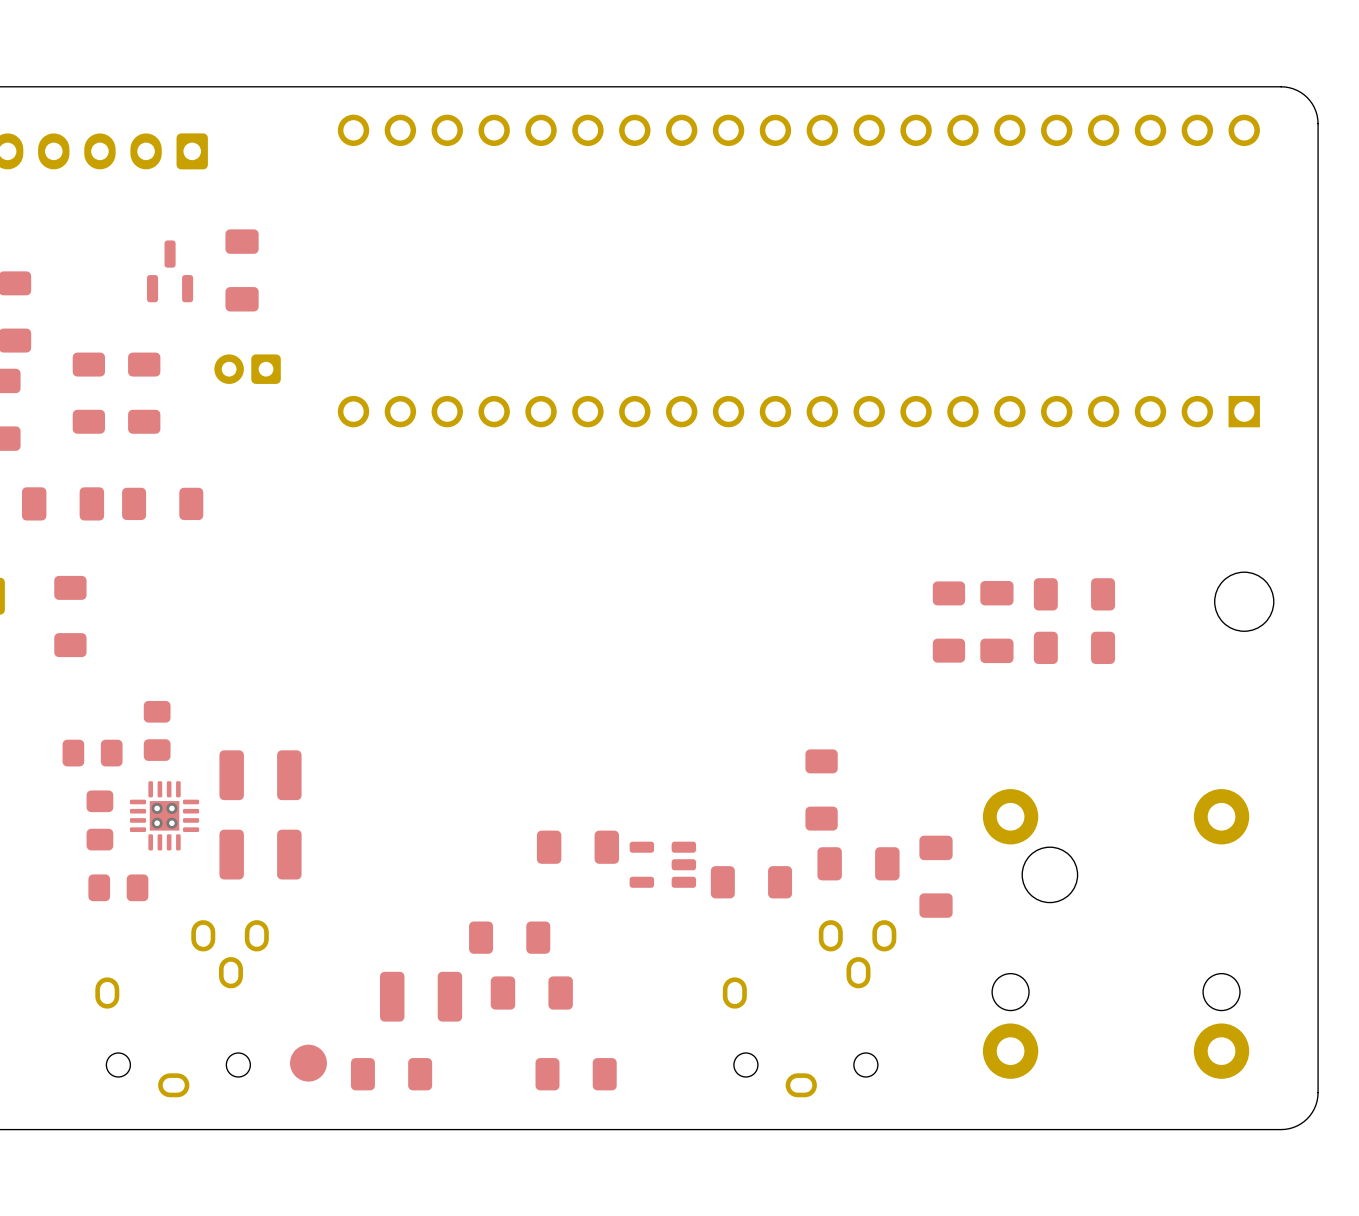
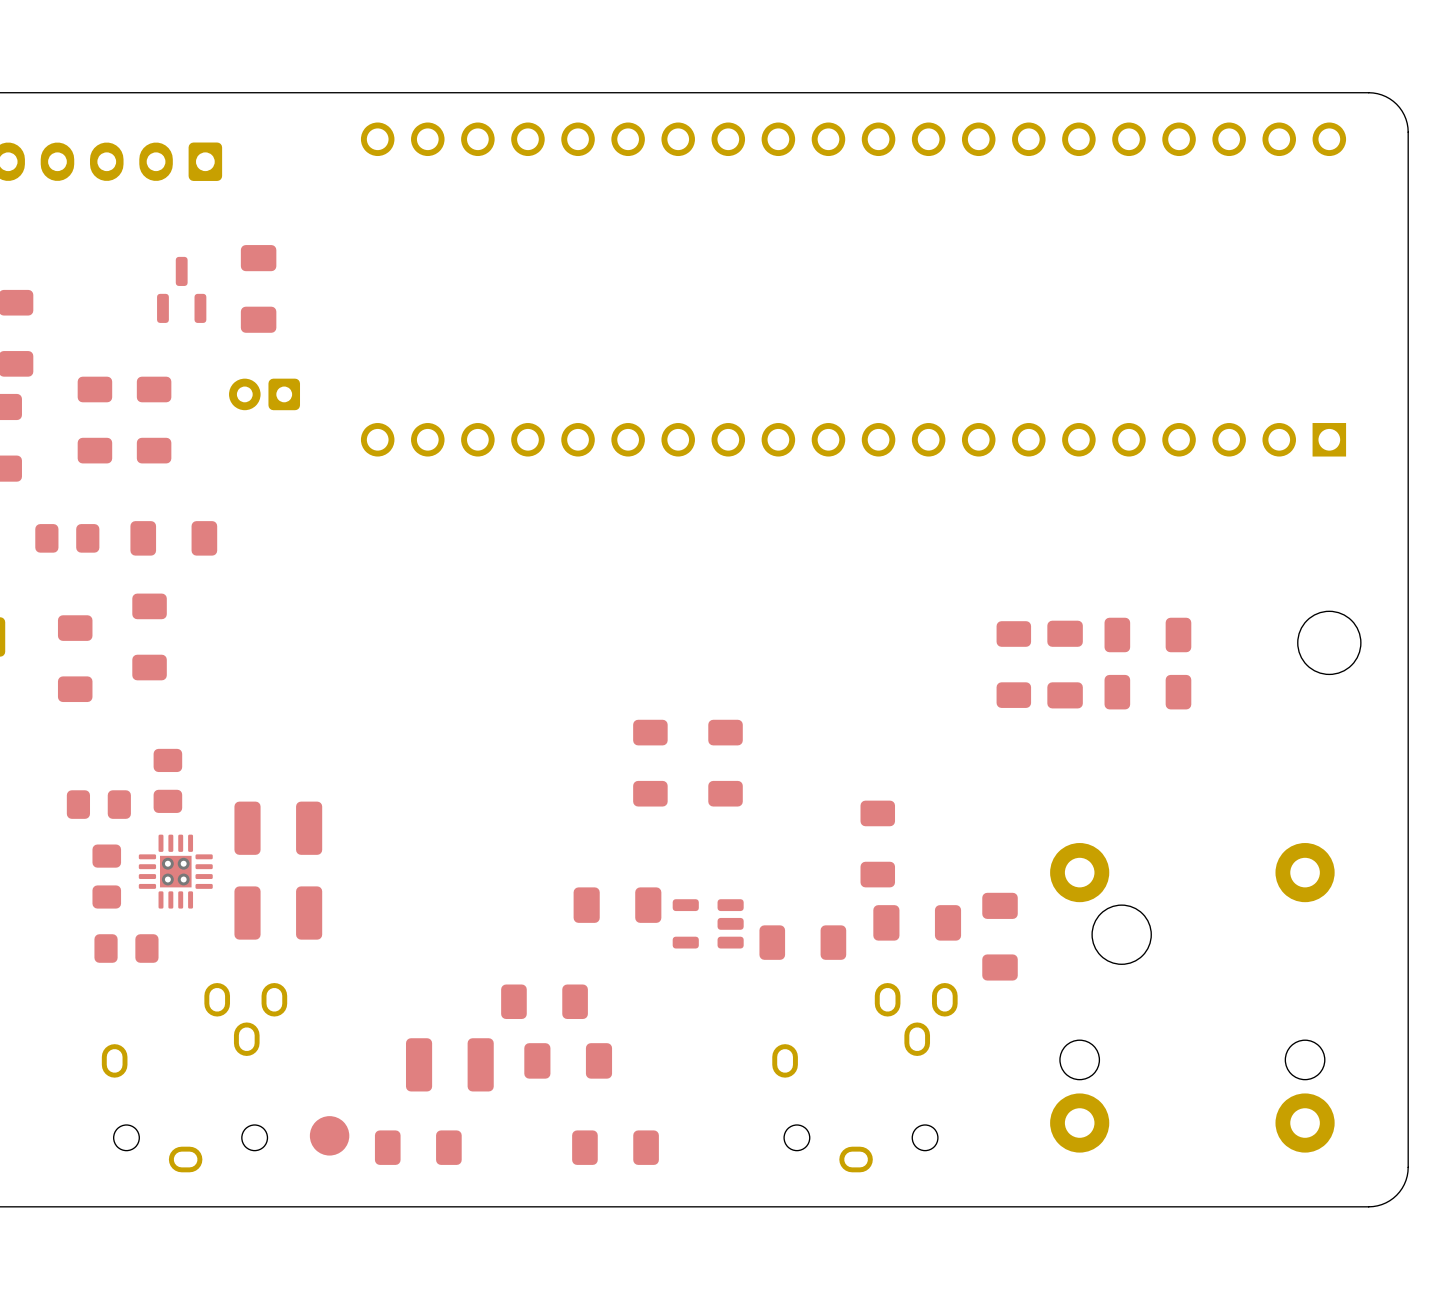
part footprint: [21, 487, 105, 521] -> [35, 524, 100, 553]
part: none -> (149, 636)
part: none -> (650, 763)
part: none -> (725, 763)

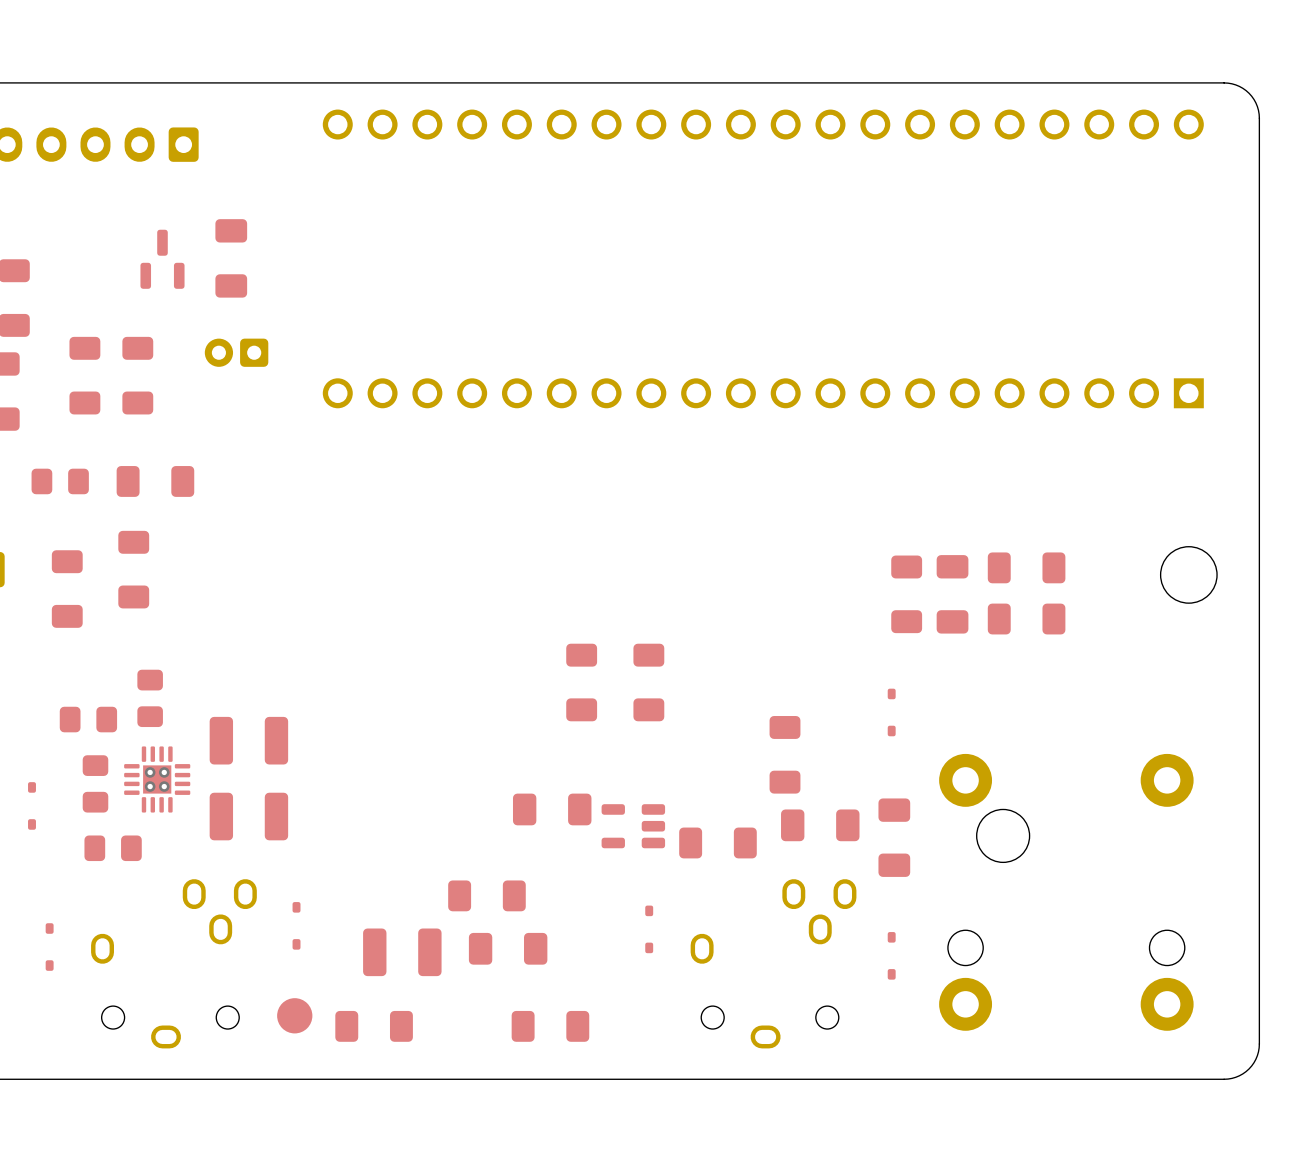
part: none -> (891, 712)
part: none -> (31, 805)
part: none -> (296, 925)
part: none -> (649, 929)
part: none -> (49, 947)
part: none -> (891, 955)

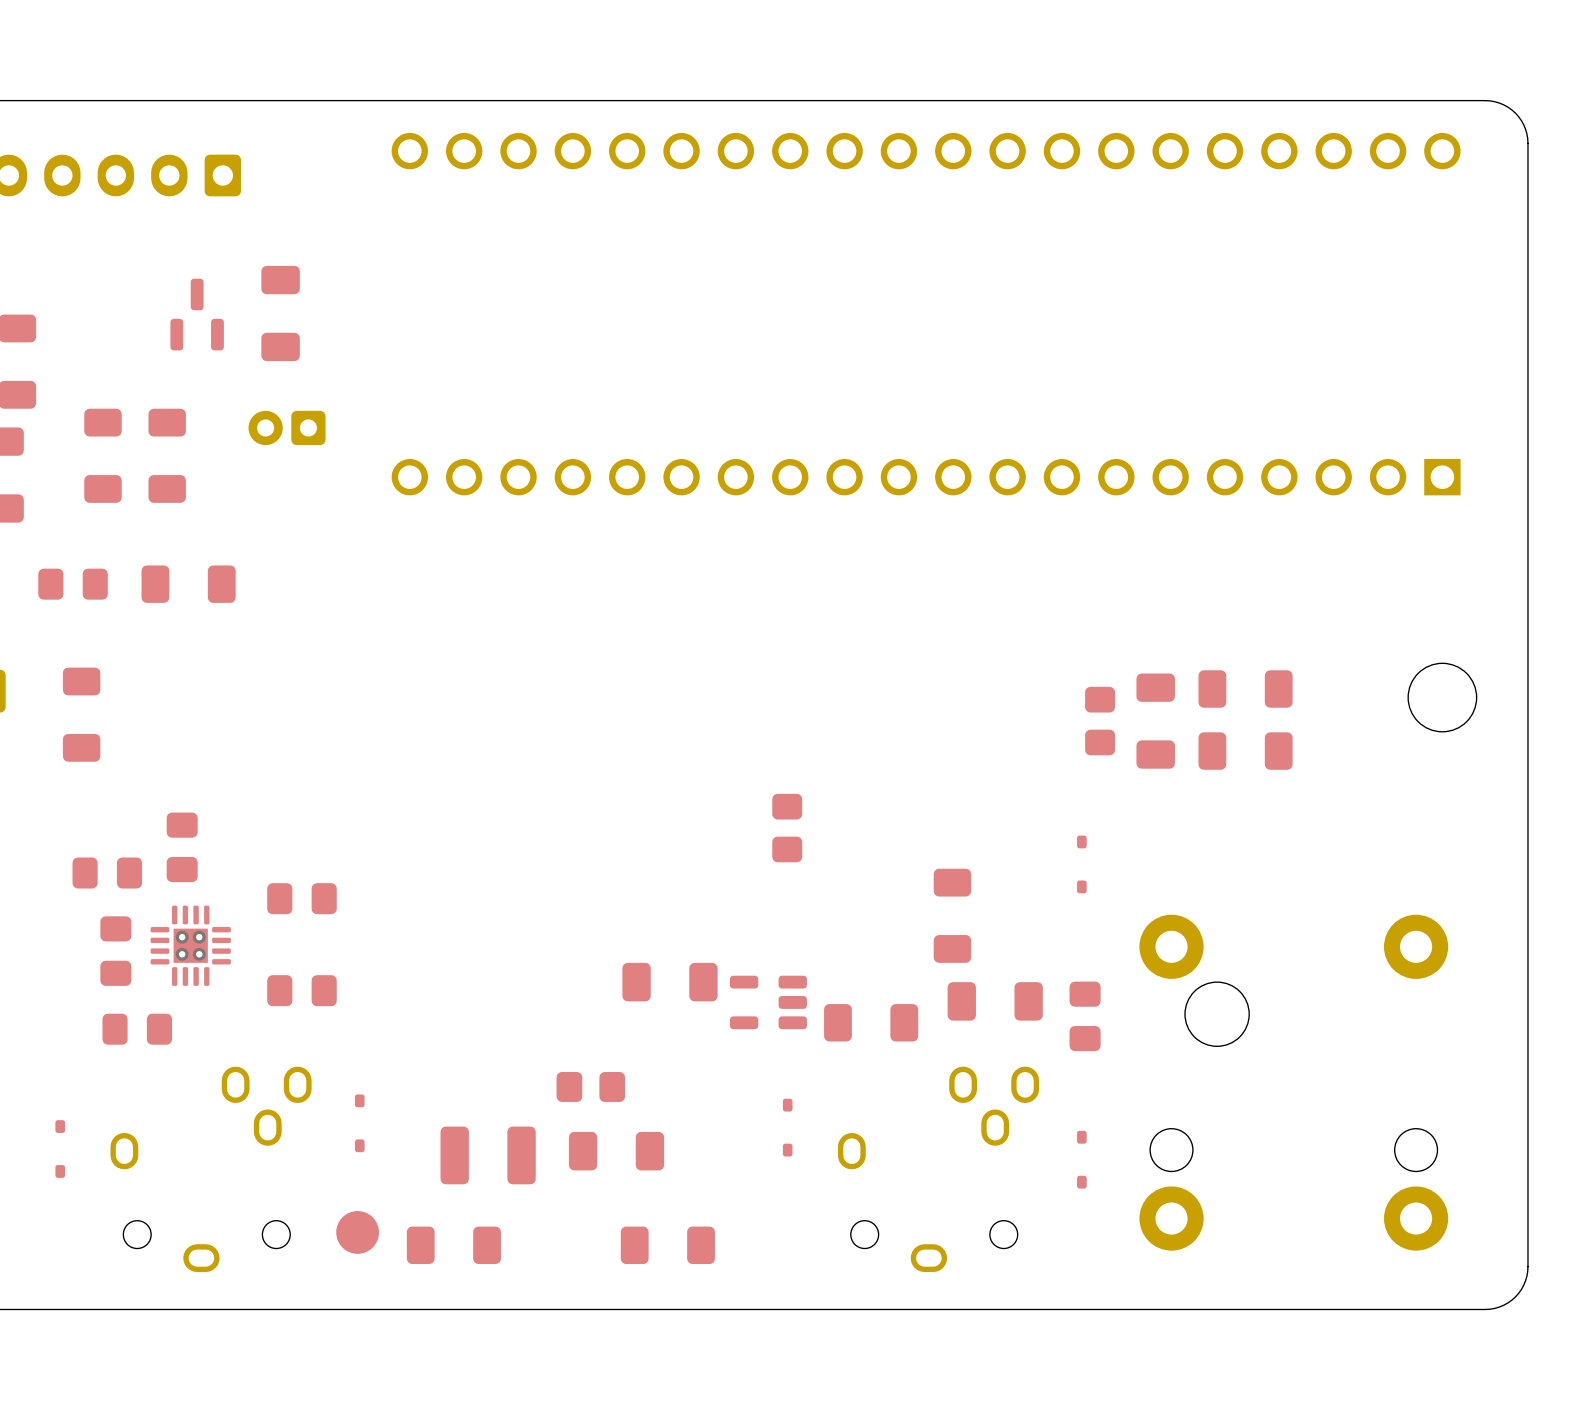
part footprint: [891, 555, 923, 634] -> [1085, 686, 1116, 756]
part: (133, 569) -> none
part footprint: [633, 643, 665, 722] -> [772, 793, 803, 863]
part: (581, 682) -> none
part footprint: [209, 716, 289, 765] -> [267, 883, 337, 915]
part footprint: [209, 792, 289, 841] -> [267, 975, 337, 1007]
part footprint: [878, 798, 911, 877] -> [1069, 981, 1101, 1052]
part: (31, 805) -> none
part footprint: [448, 880, 526, 912] -> [556, 1071, 626, 1102]

